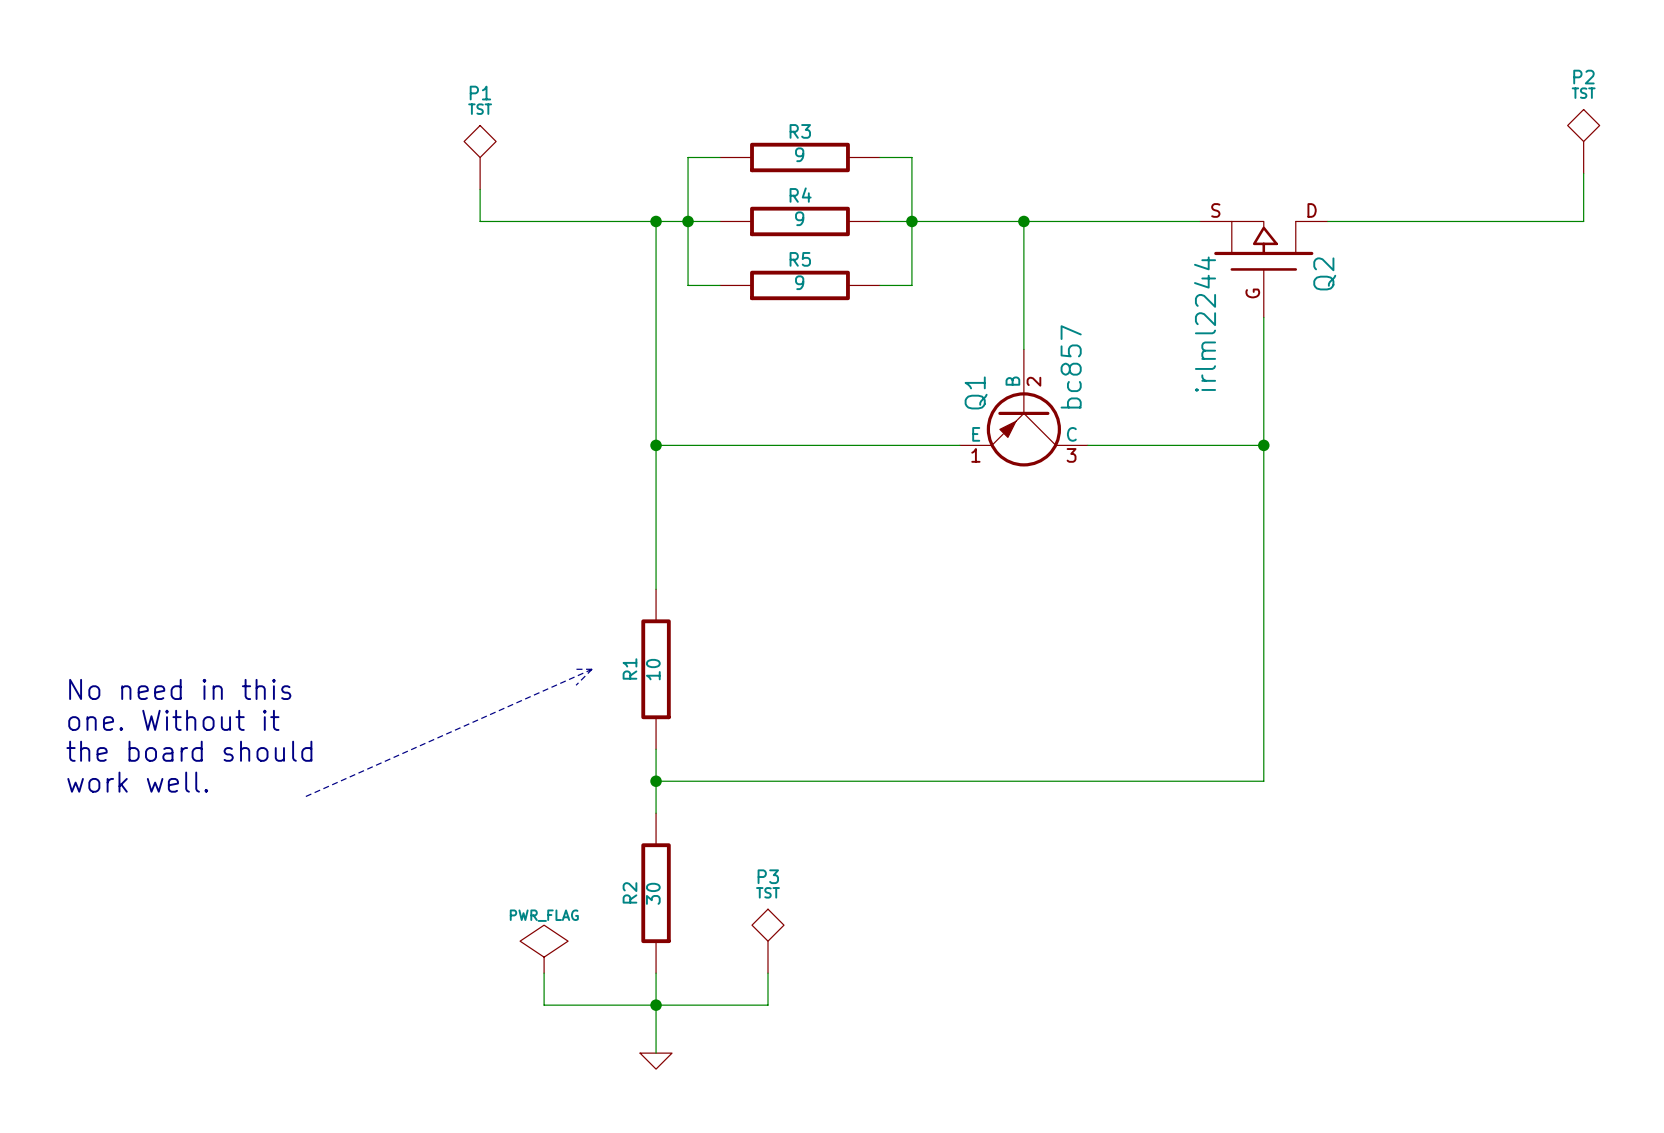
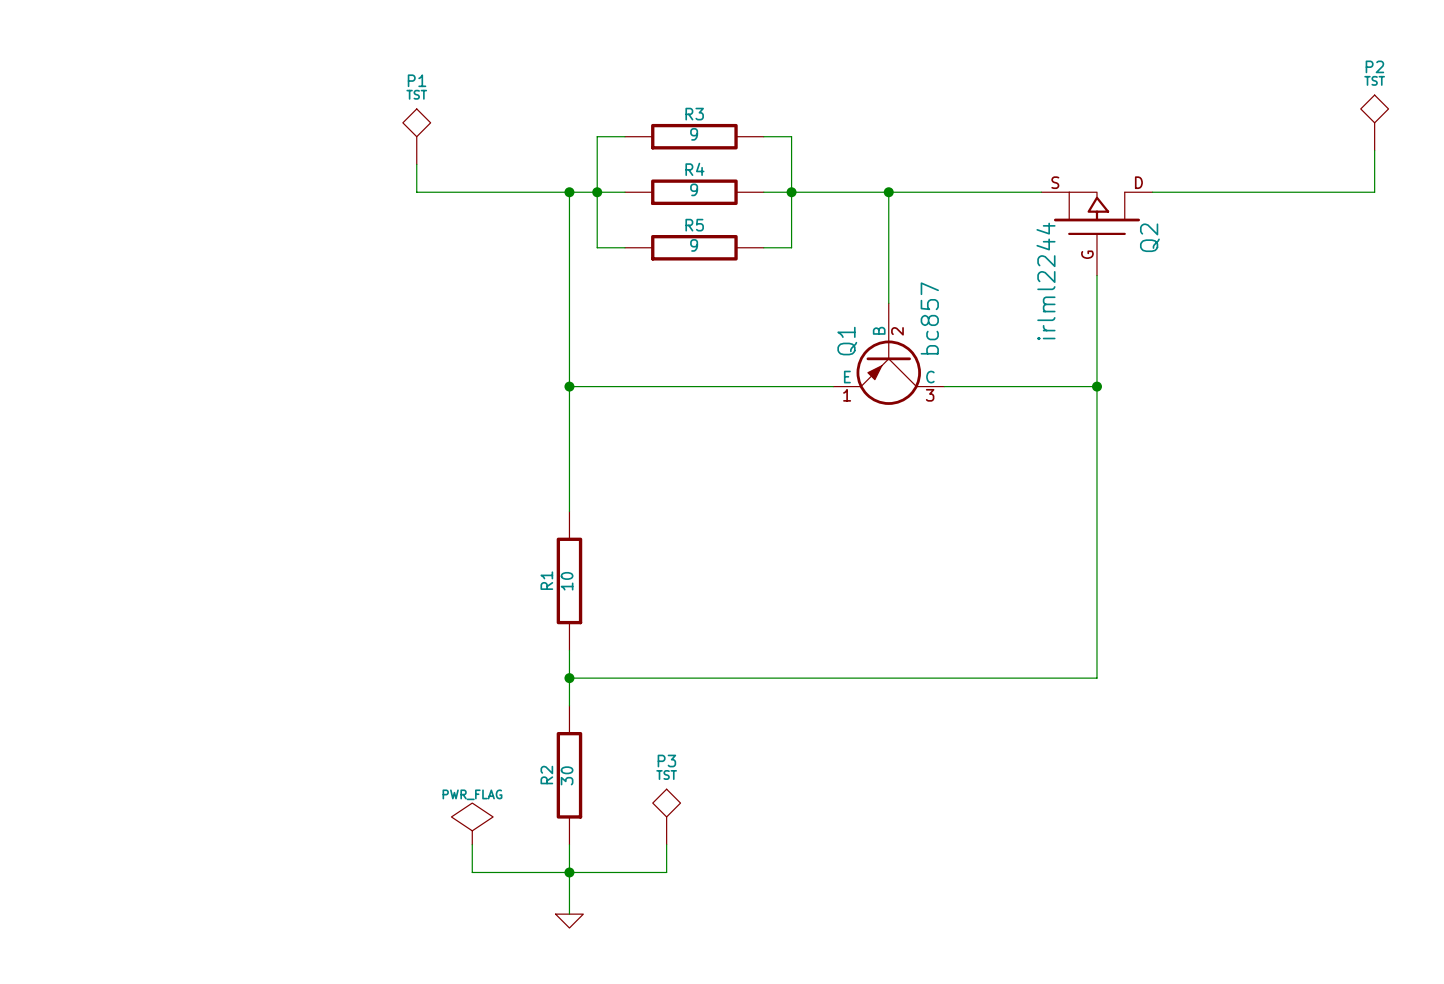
line: (576, 669) (592, 669) -> none
line: (592, 669) (304, 797) -> none
line: (592, 669) (576, 685) -> none
text: No need in this (180, 689) -> none
text: one. Without it (173, 720) -> none
text: the board should (189, 751) -> none
text: work well. (137, 782) -> none

